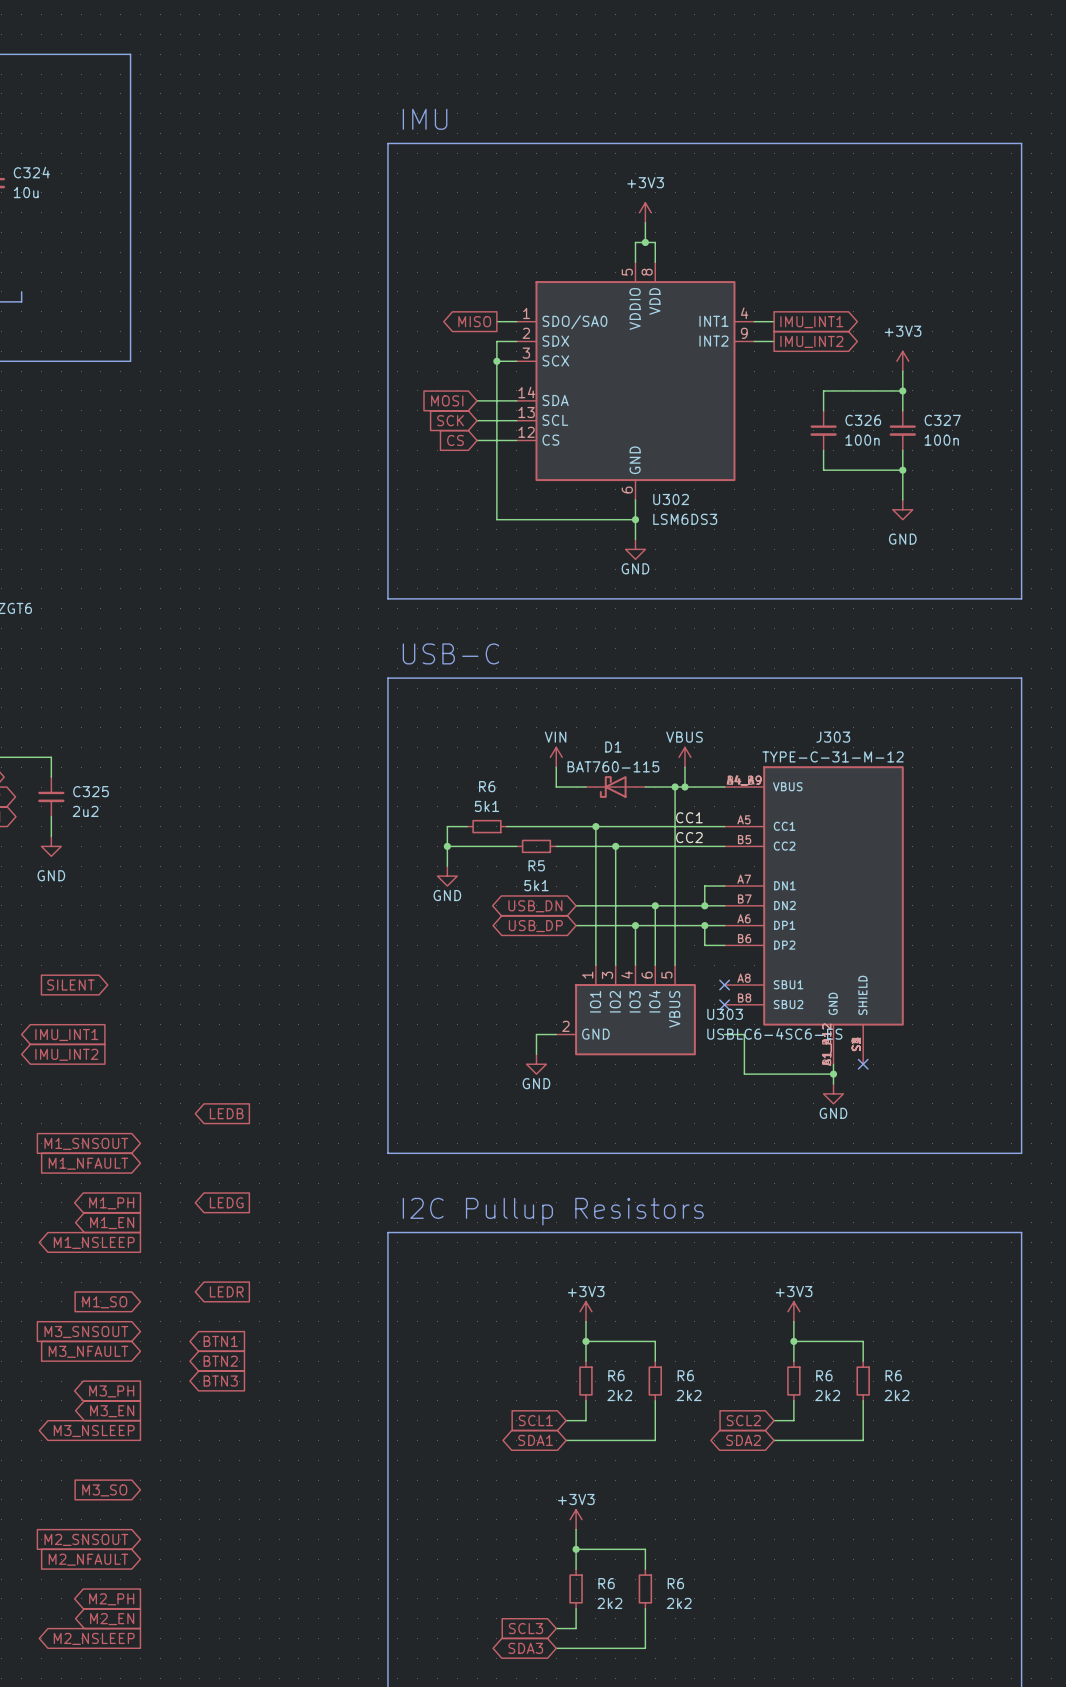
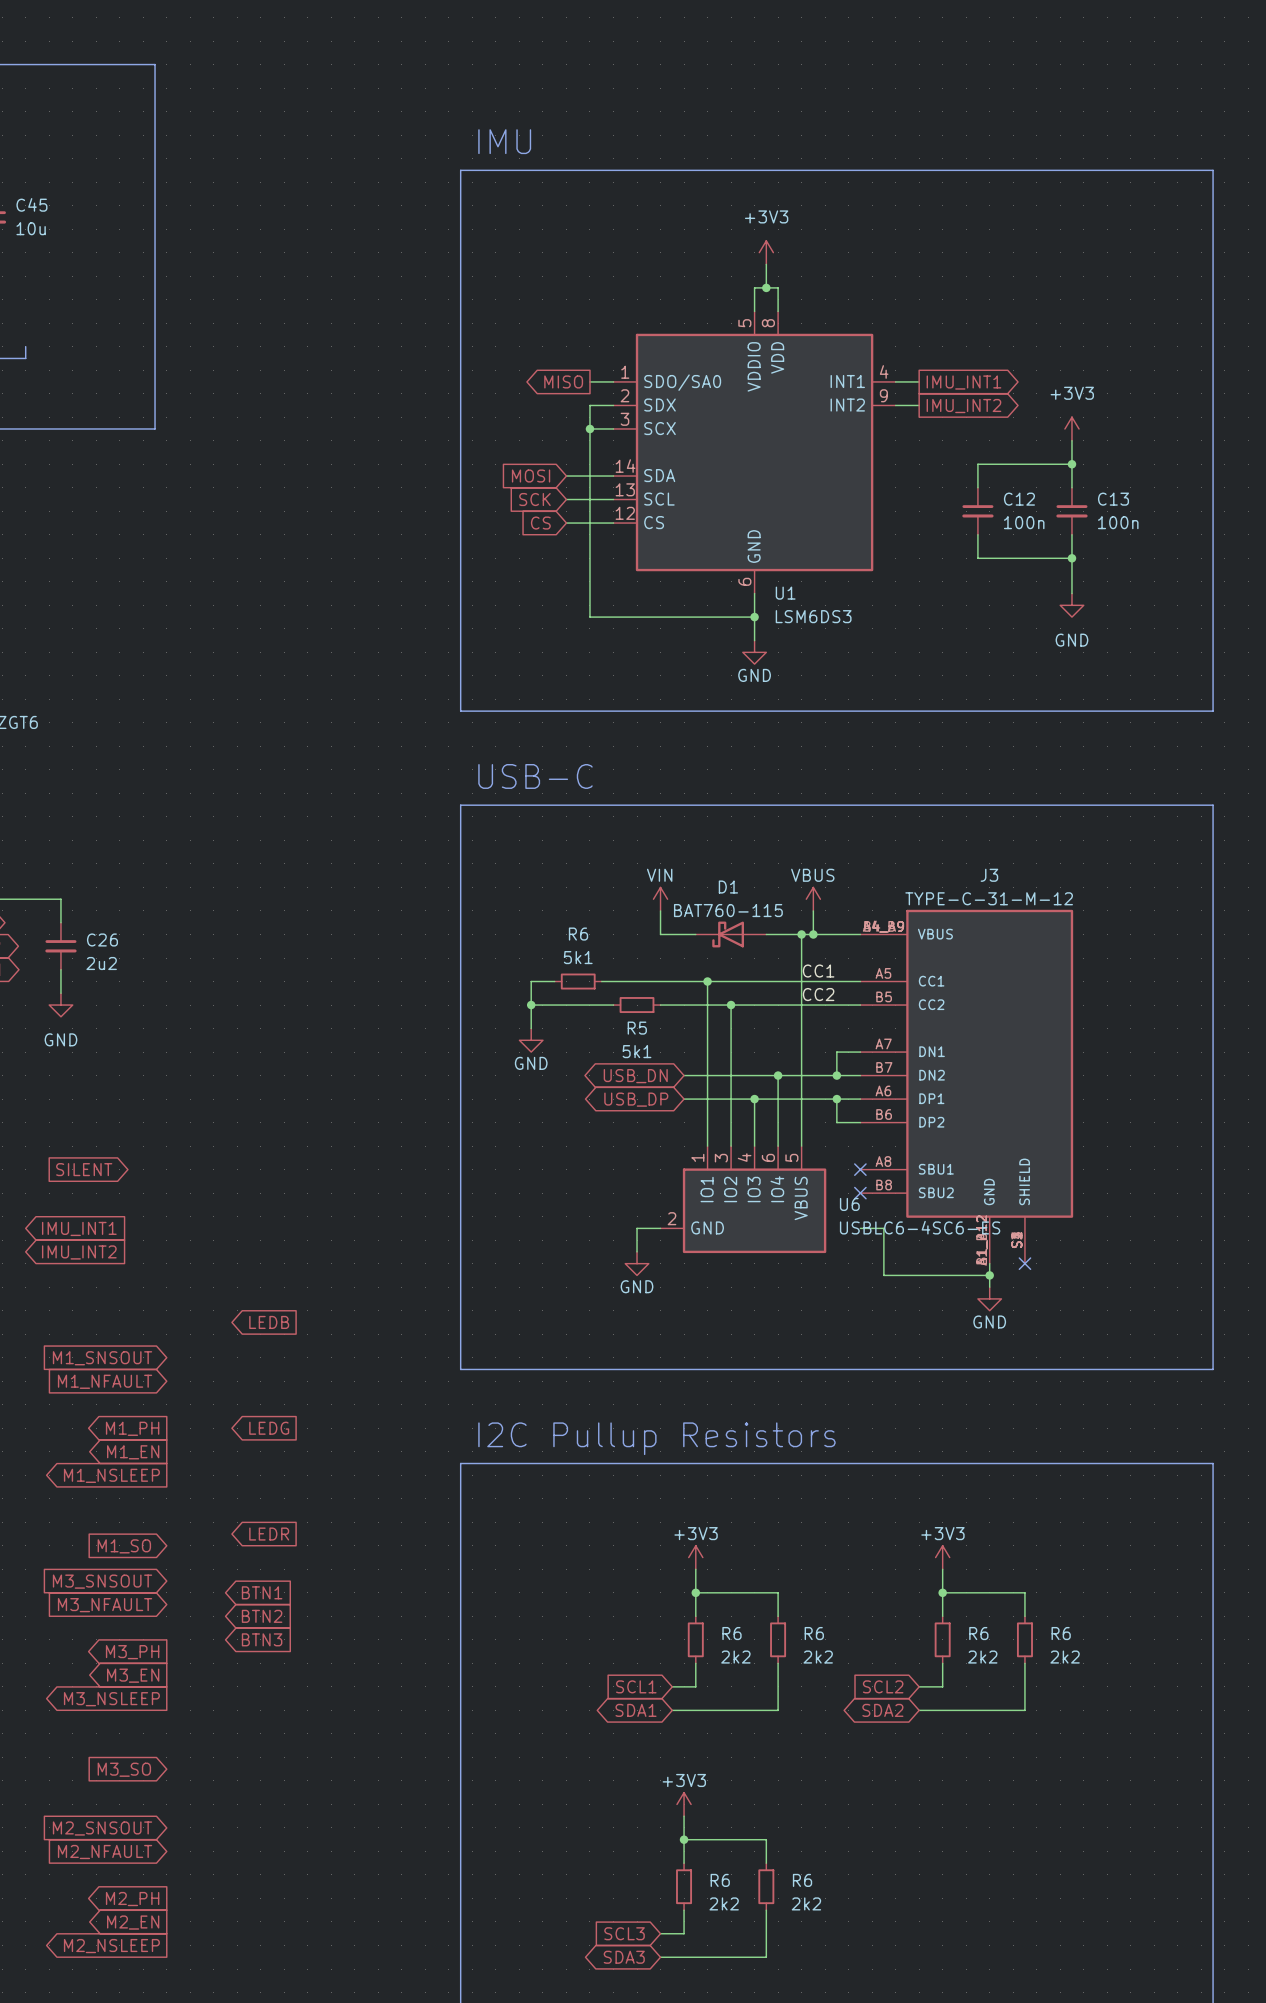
C324 name: C324 (31, 172) -> C45 (31, 204)
C326 name: C326 (863, 420) -> C12 (1019, 499)
C327 name: C327 (942, 420) -> C13 (1113, 499)
U302 name: U302 (671, 499) -> U1 (785, 593)
J303 name: J303 (833, 737) -> J3 (989, 875)
C325 name: C325 (91, 791) -> C26 (102, 939)
U303 name: U303 (725, 1014) -> U6 (849, 1204)

